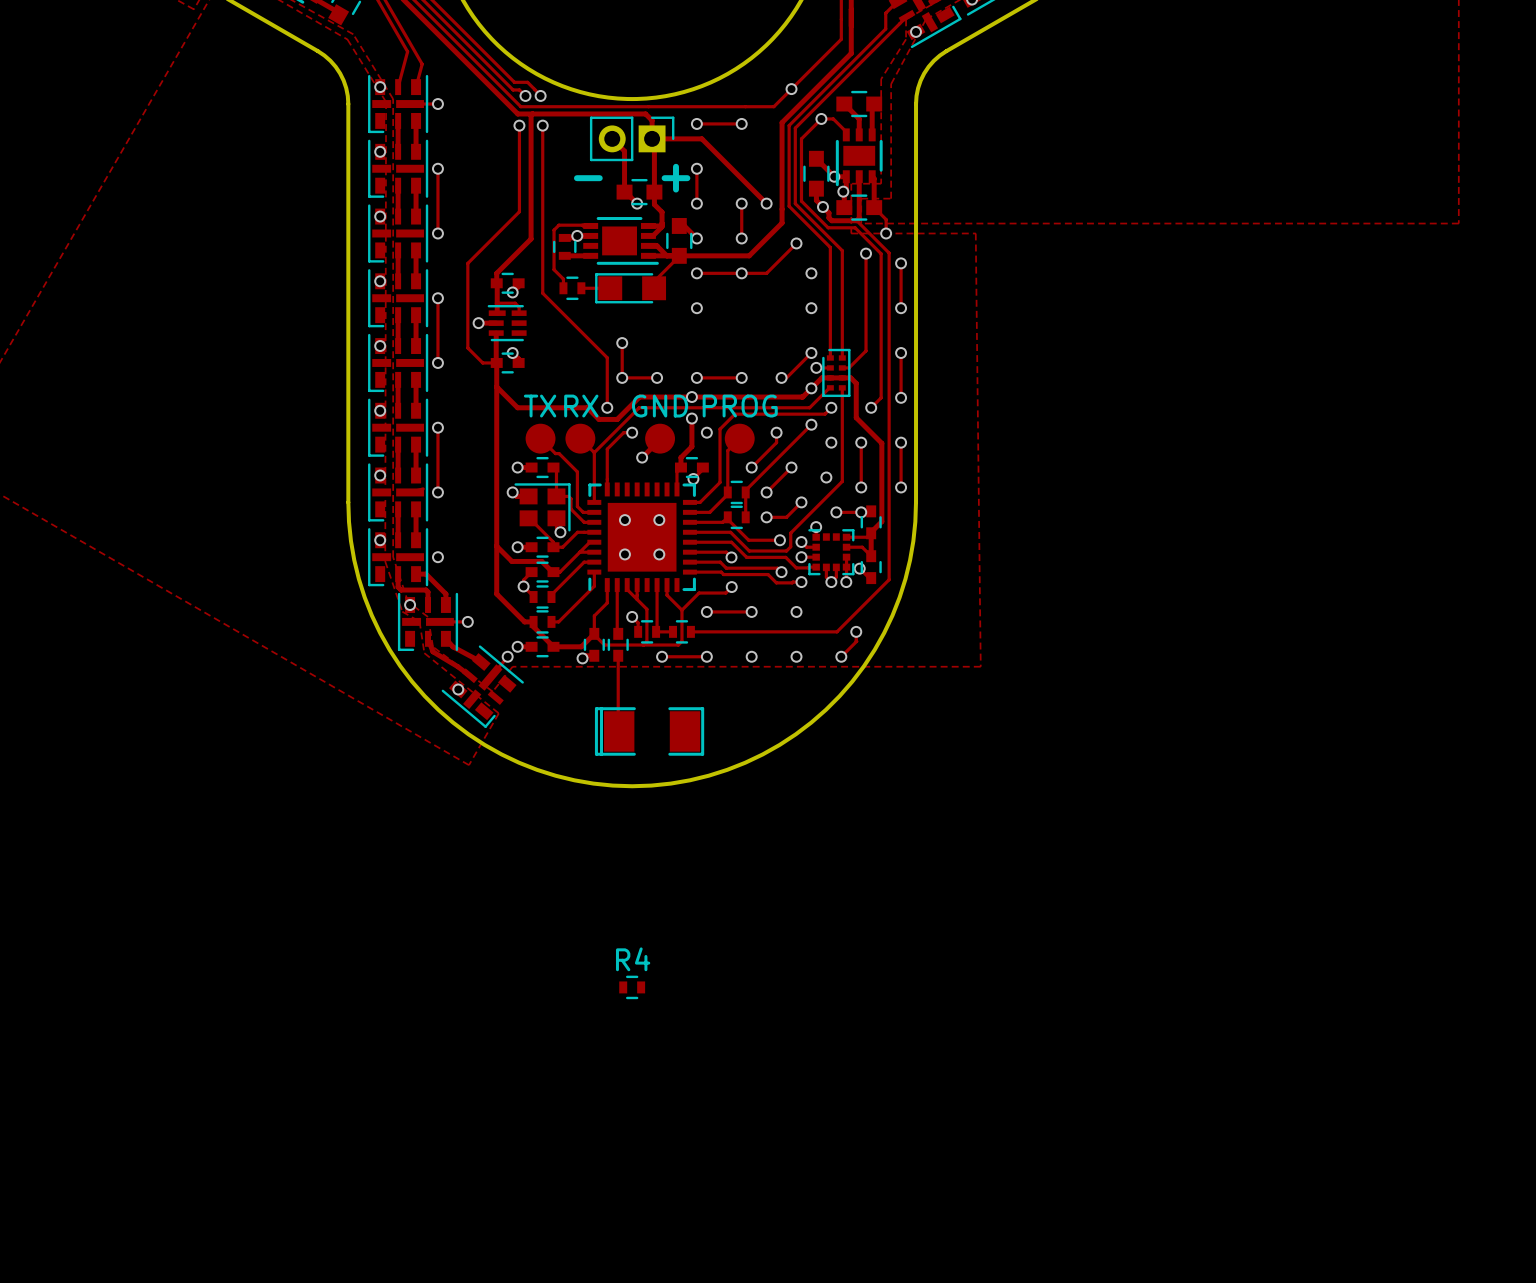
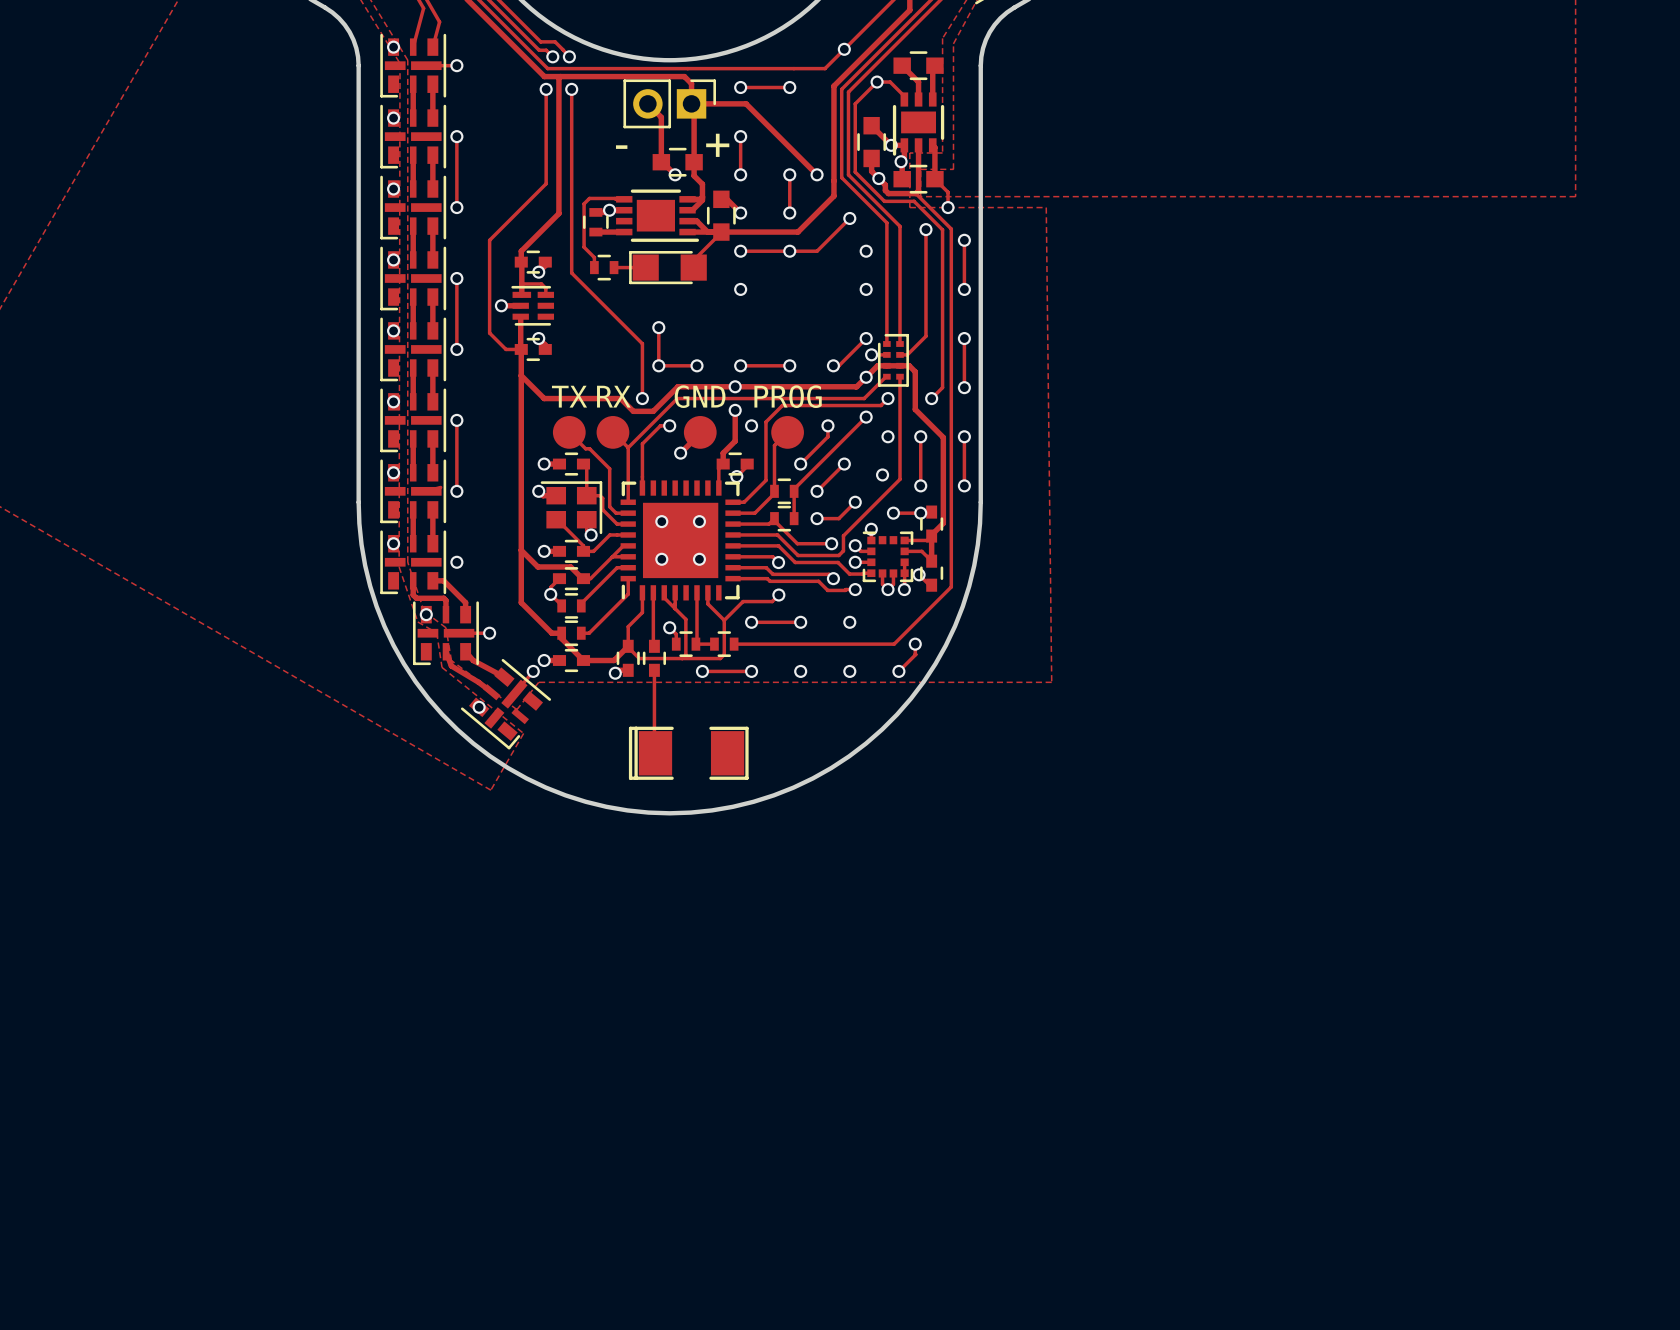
R4: (632, 987) -> none

